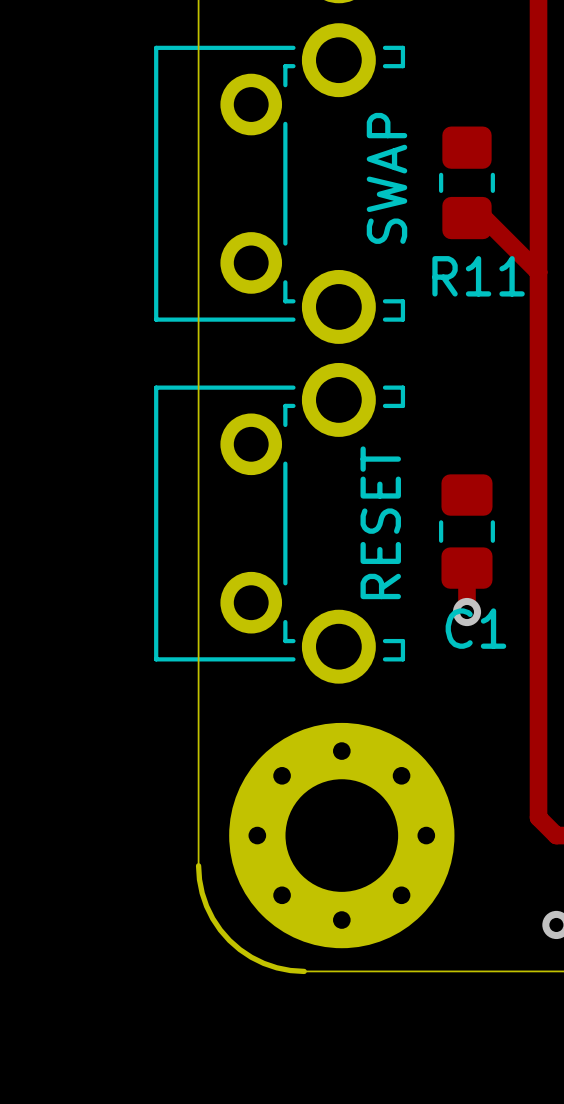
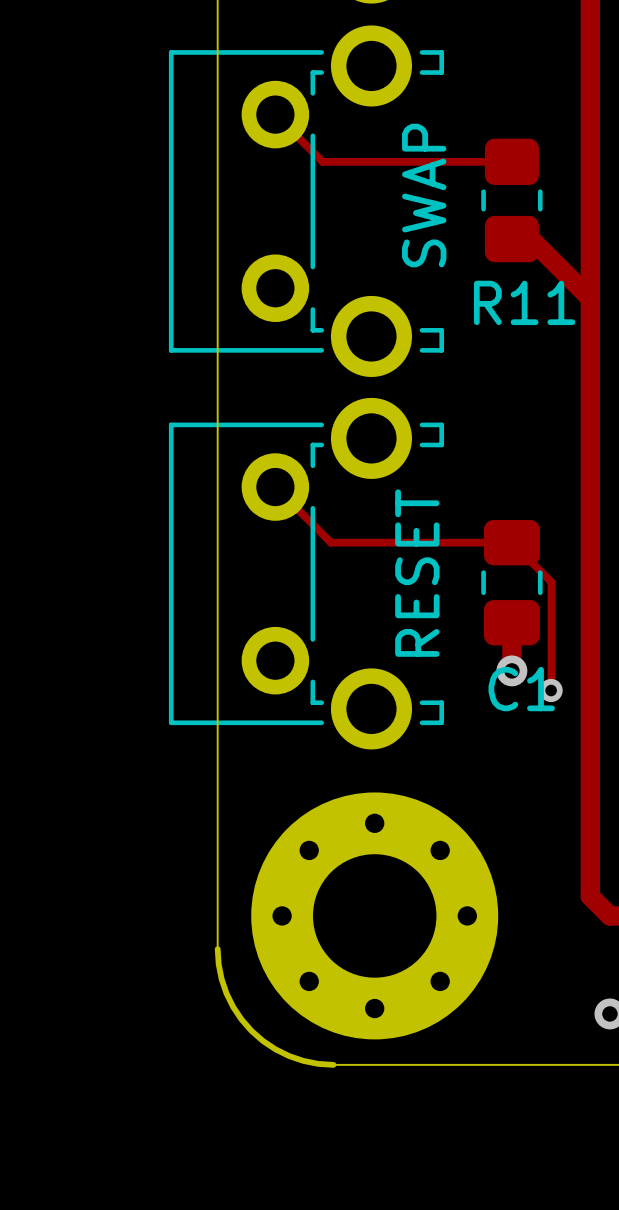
track: none -> (275, 114) (322, 161) (511, 161)
track: none -> (275, 487) (331, 542) (511, 542) (551, 582) (551, 690)
via: none -> (551, 690)

